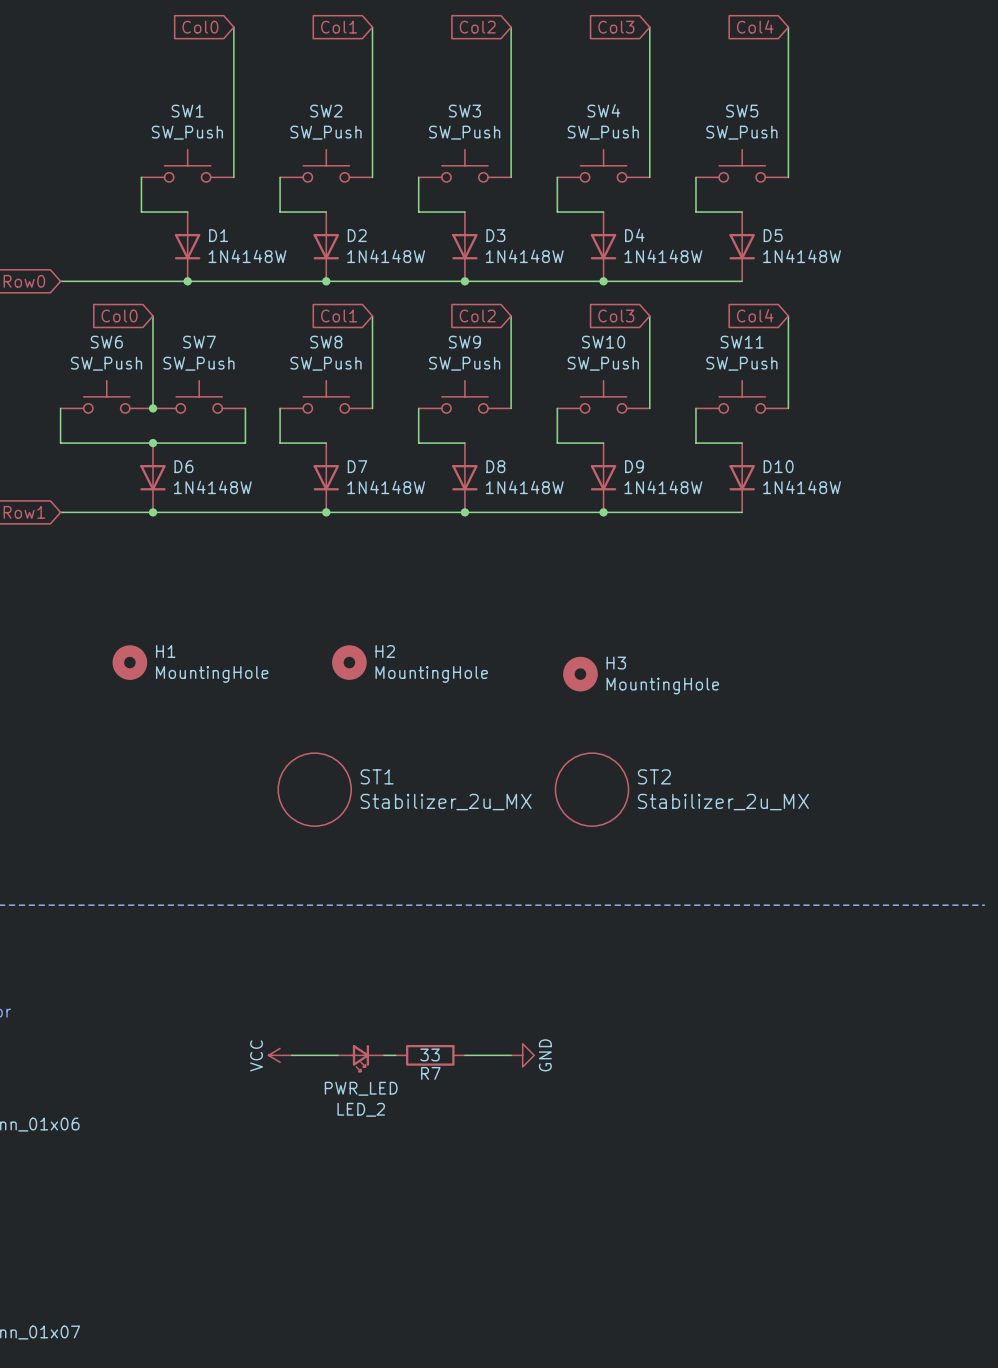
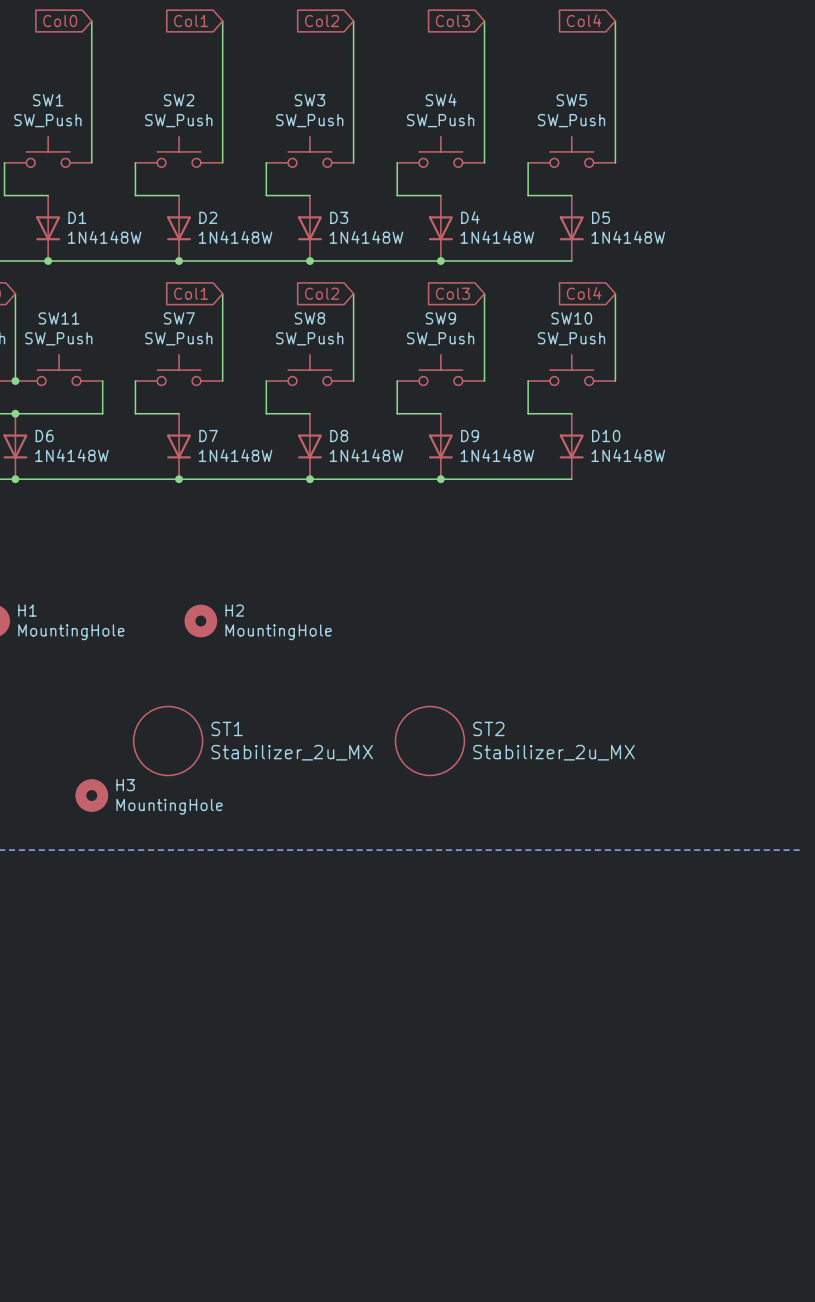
SW7 name: SW7 (199, 342) -> SW11 (59, 318)
SW8 name: SW8 (326, 342) -> SW7 (179, 318)
SW9 name: SW9 (464, 342) -> SW8 (309, 318)
SW10 name: SW10 (603, 342) -> SW9 (440, 318)
SW11 name: SW11 (742, 342) -> SW10 (571, 318)
H3 position: (580, 674) -> (91, 795)
power symbol: VCC (280, 1055) -> none
wire: (291, 1055) (337, 1055) -> none
wire: (384, 1055) (395, 1055) -> none
R7: 33 (430, 1055) -> none
wire: (464, 1055) (511, 1055) -> none
power symbol: GND (522, 1055) -> none
LED_2: PWR_LED (360, 1058) -> none

